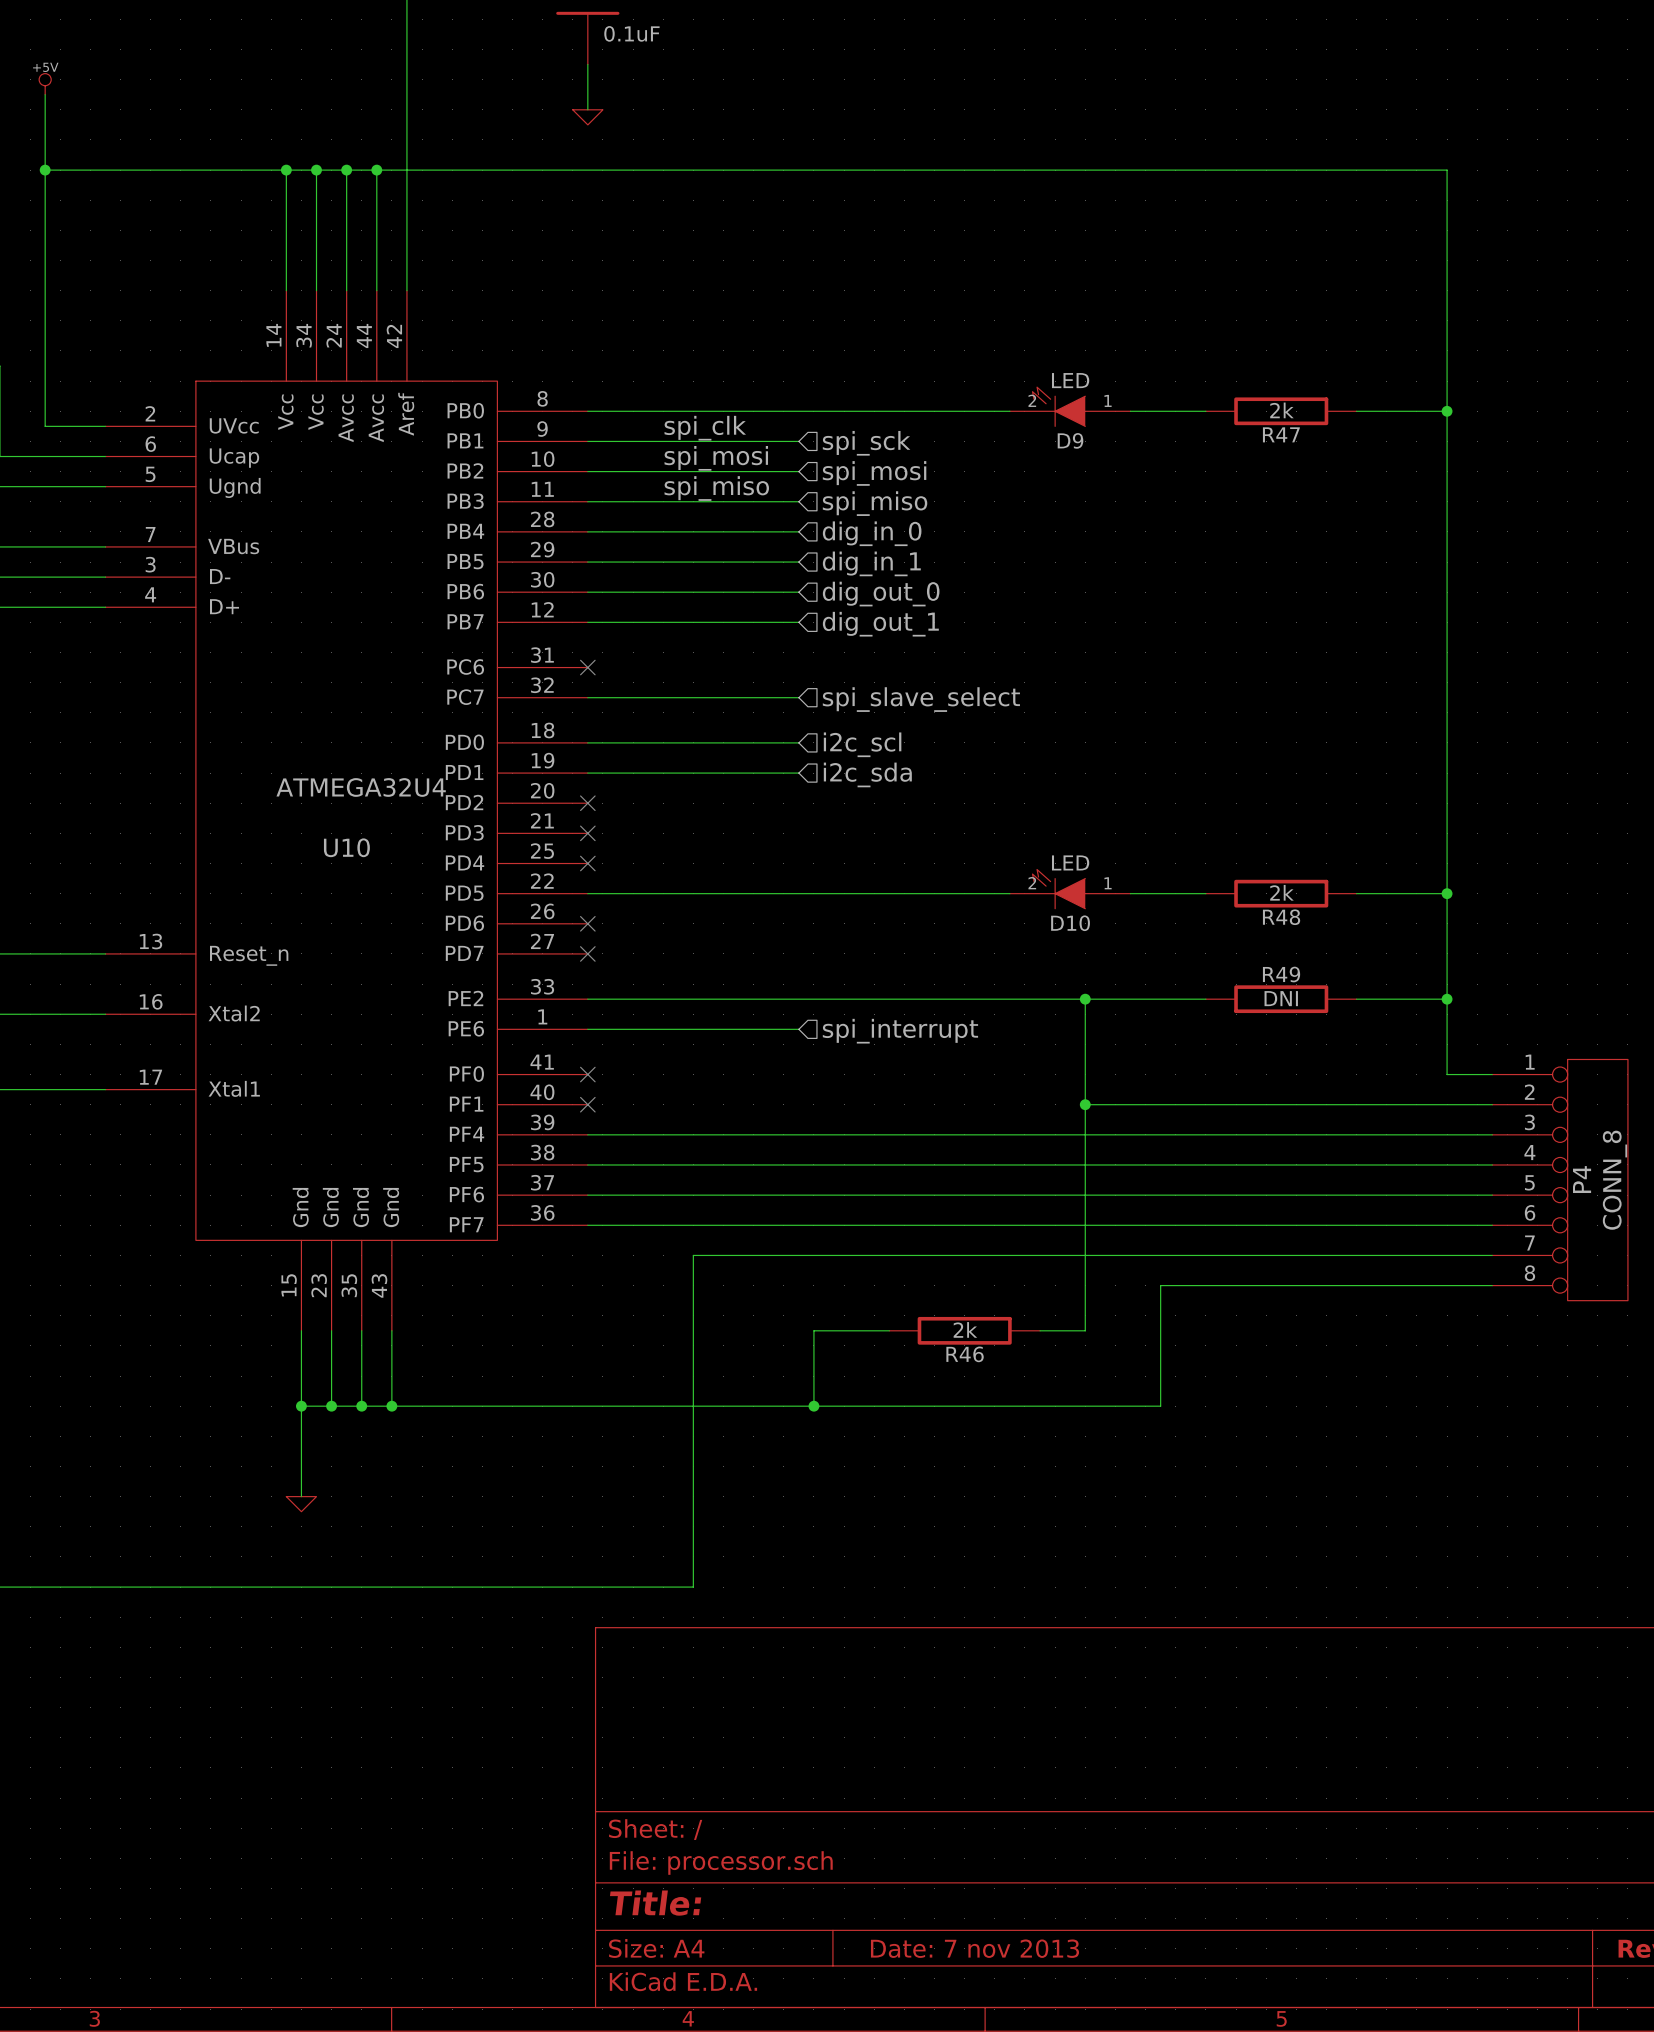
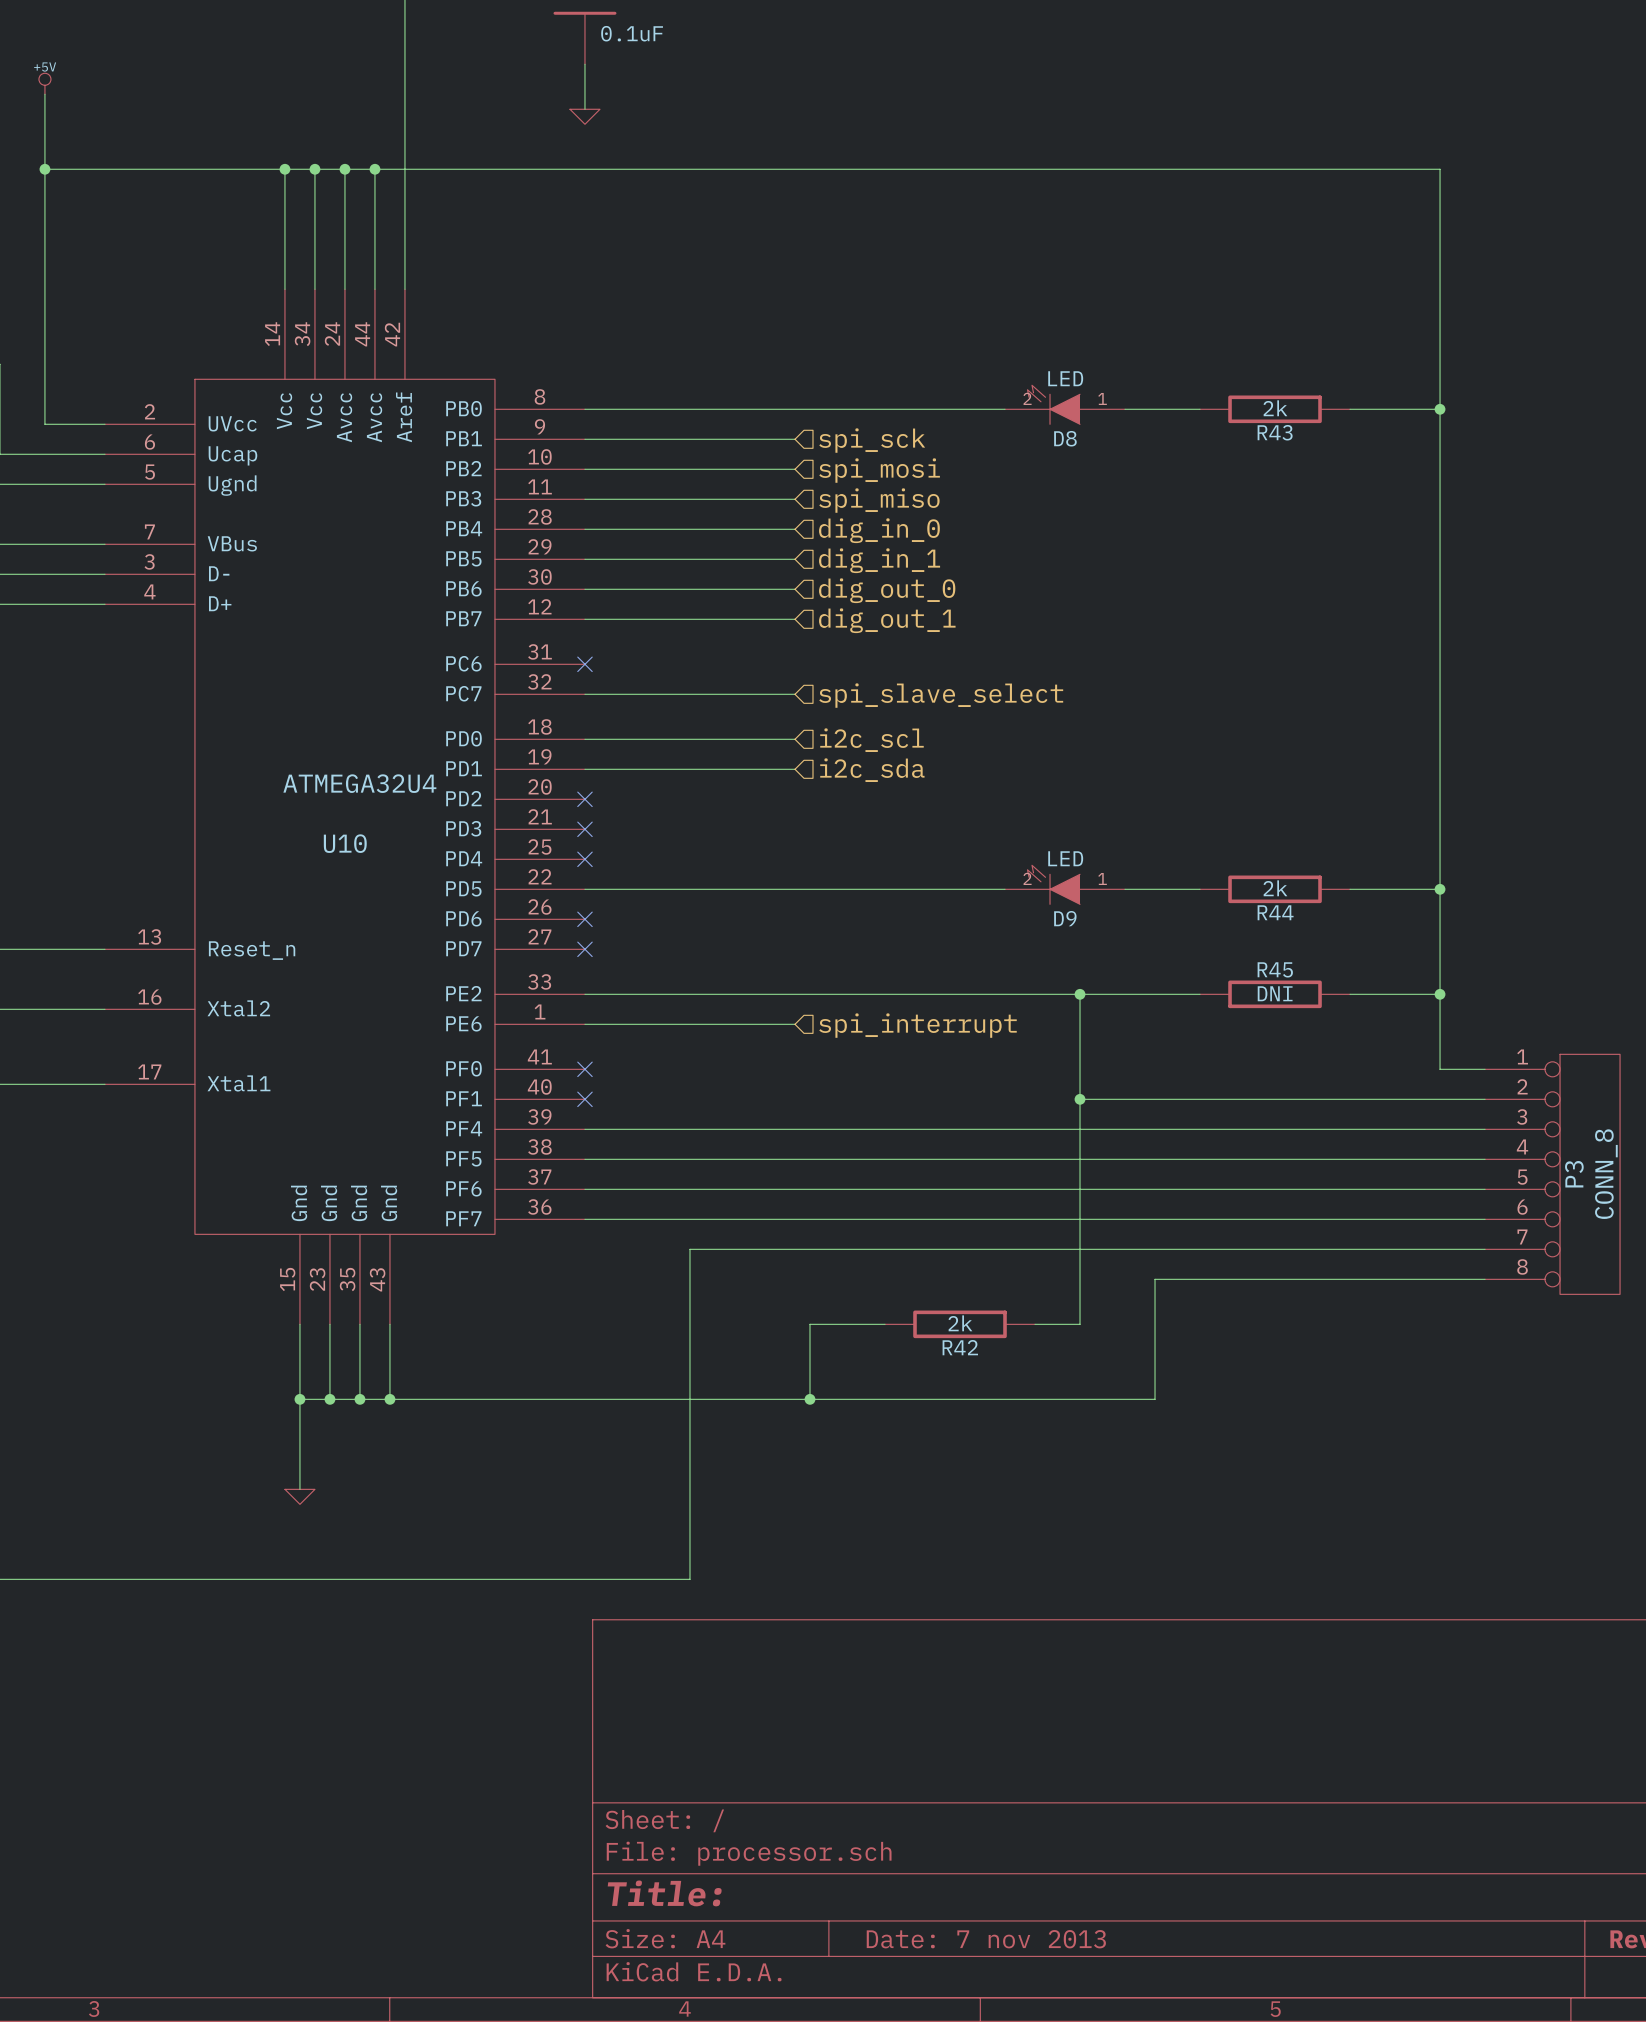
label: spi_clk (705, 428) -> none
R47 name: R47 (1281, 434) -> R43 (1275, 432)
D9 name: D9 (1070, 440) -> D8 (1065, 438)
label: spi_mosi (716, 458) -> none
label: spi_miso (716, 488) -> none
R48 name: R48 (1281, 917) -> R44 (1275, 912)
D10 name: D10 (1070, 923) -> D9 (1065, 918)
R49 name: R49 (1281, 974) -> R45 (1275, 969)
P4 name: P4 (1582, 1179) -> P3 (1574, 1174)
R46 name: R46 (965, 1354) -> R42 (960, 1347)

